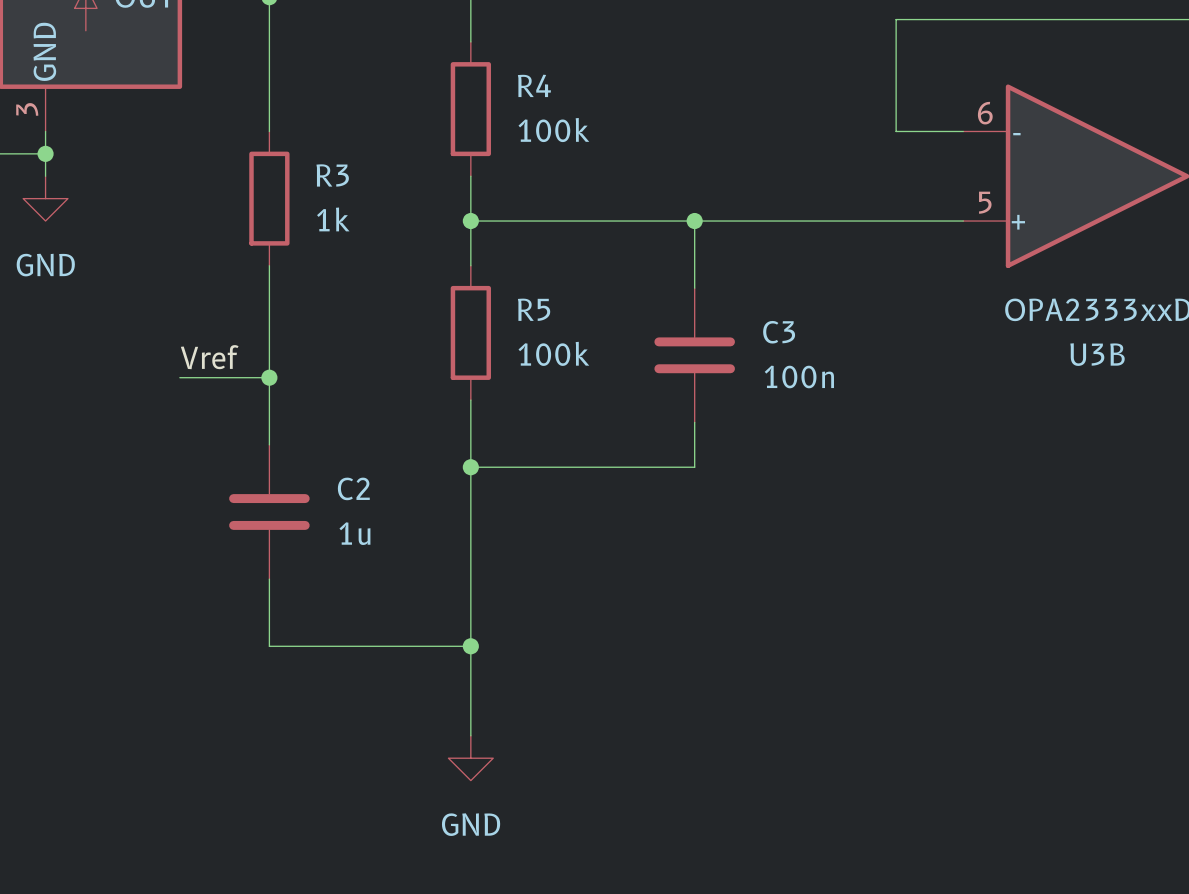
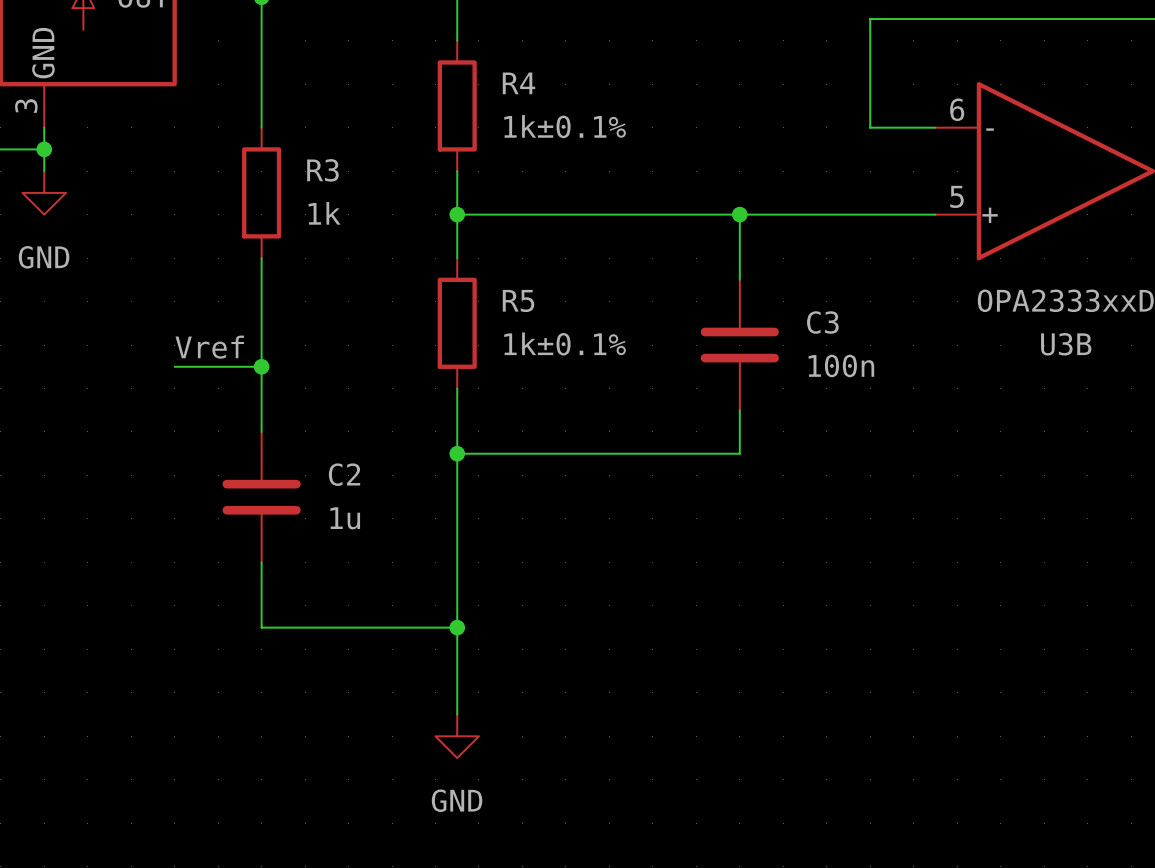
R4 value: 100k (553, 130) -> 1k±0.1% (565, 126)
wire: (694, 221) (694, 288) -> (739, 214) (739, 279)
junction position: (694, 221) -> (739, 214)
R5 value: 100k (553, 353) -> 1k±0.1% (565, 343)
C3 position: (694, 355) -> (739, 345)
wire: (694, 422) (694, 467) -> (739, 410) (739, 453) (674, 453)

